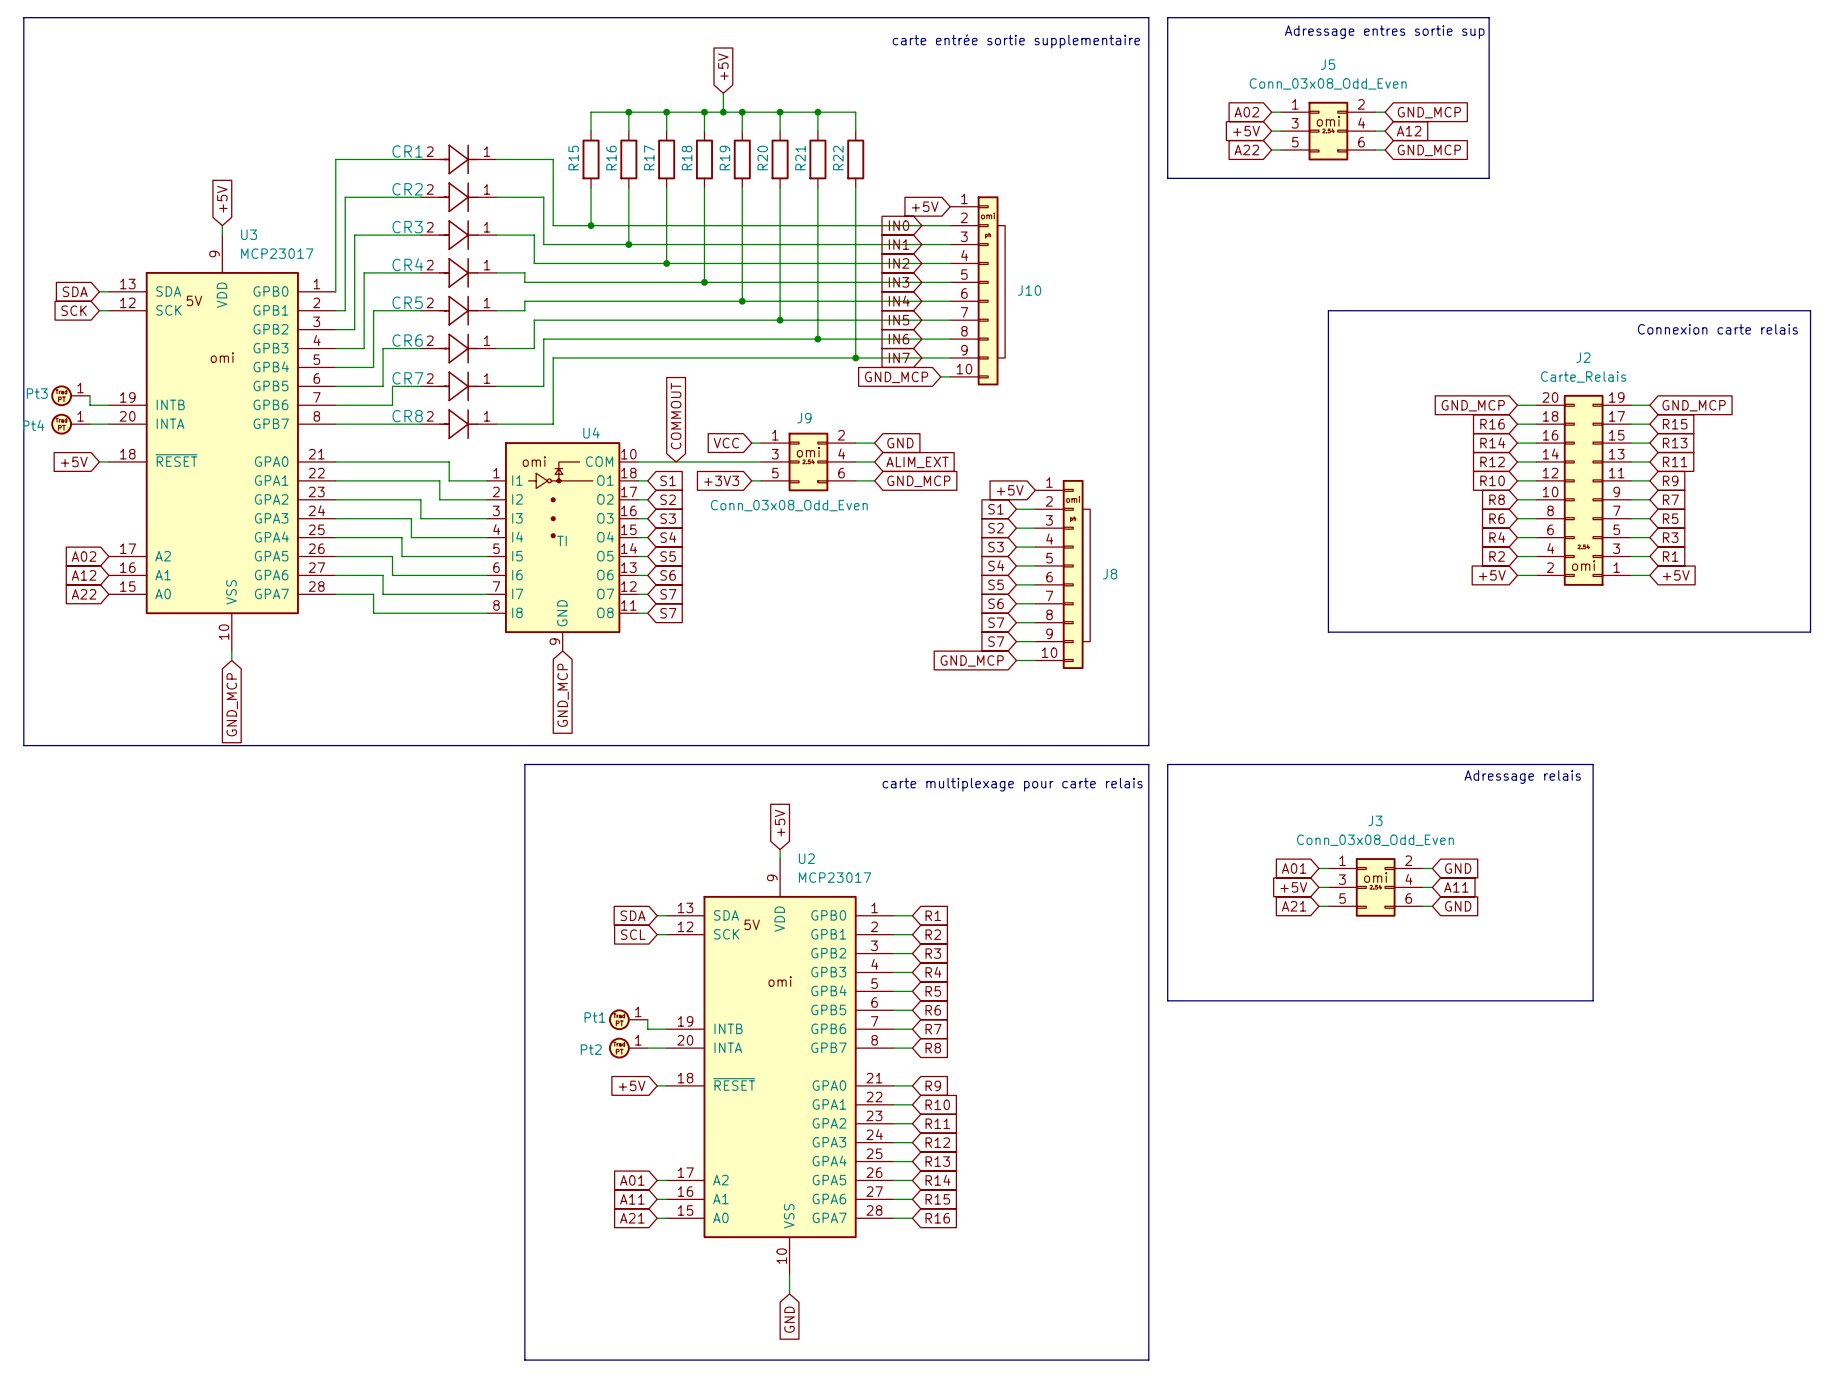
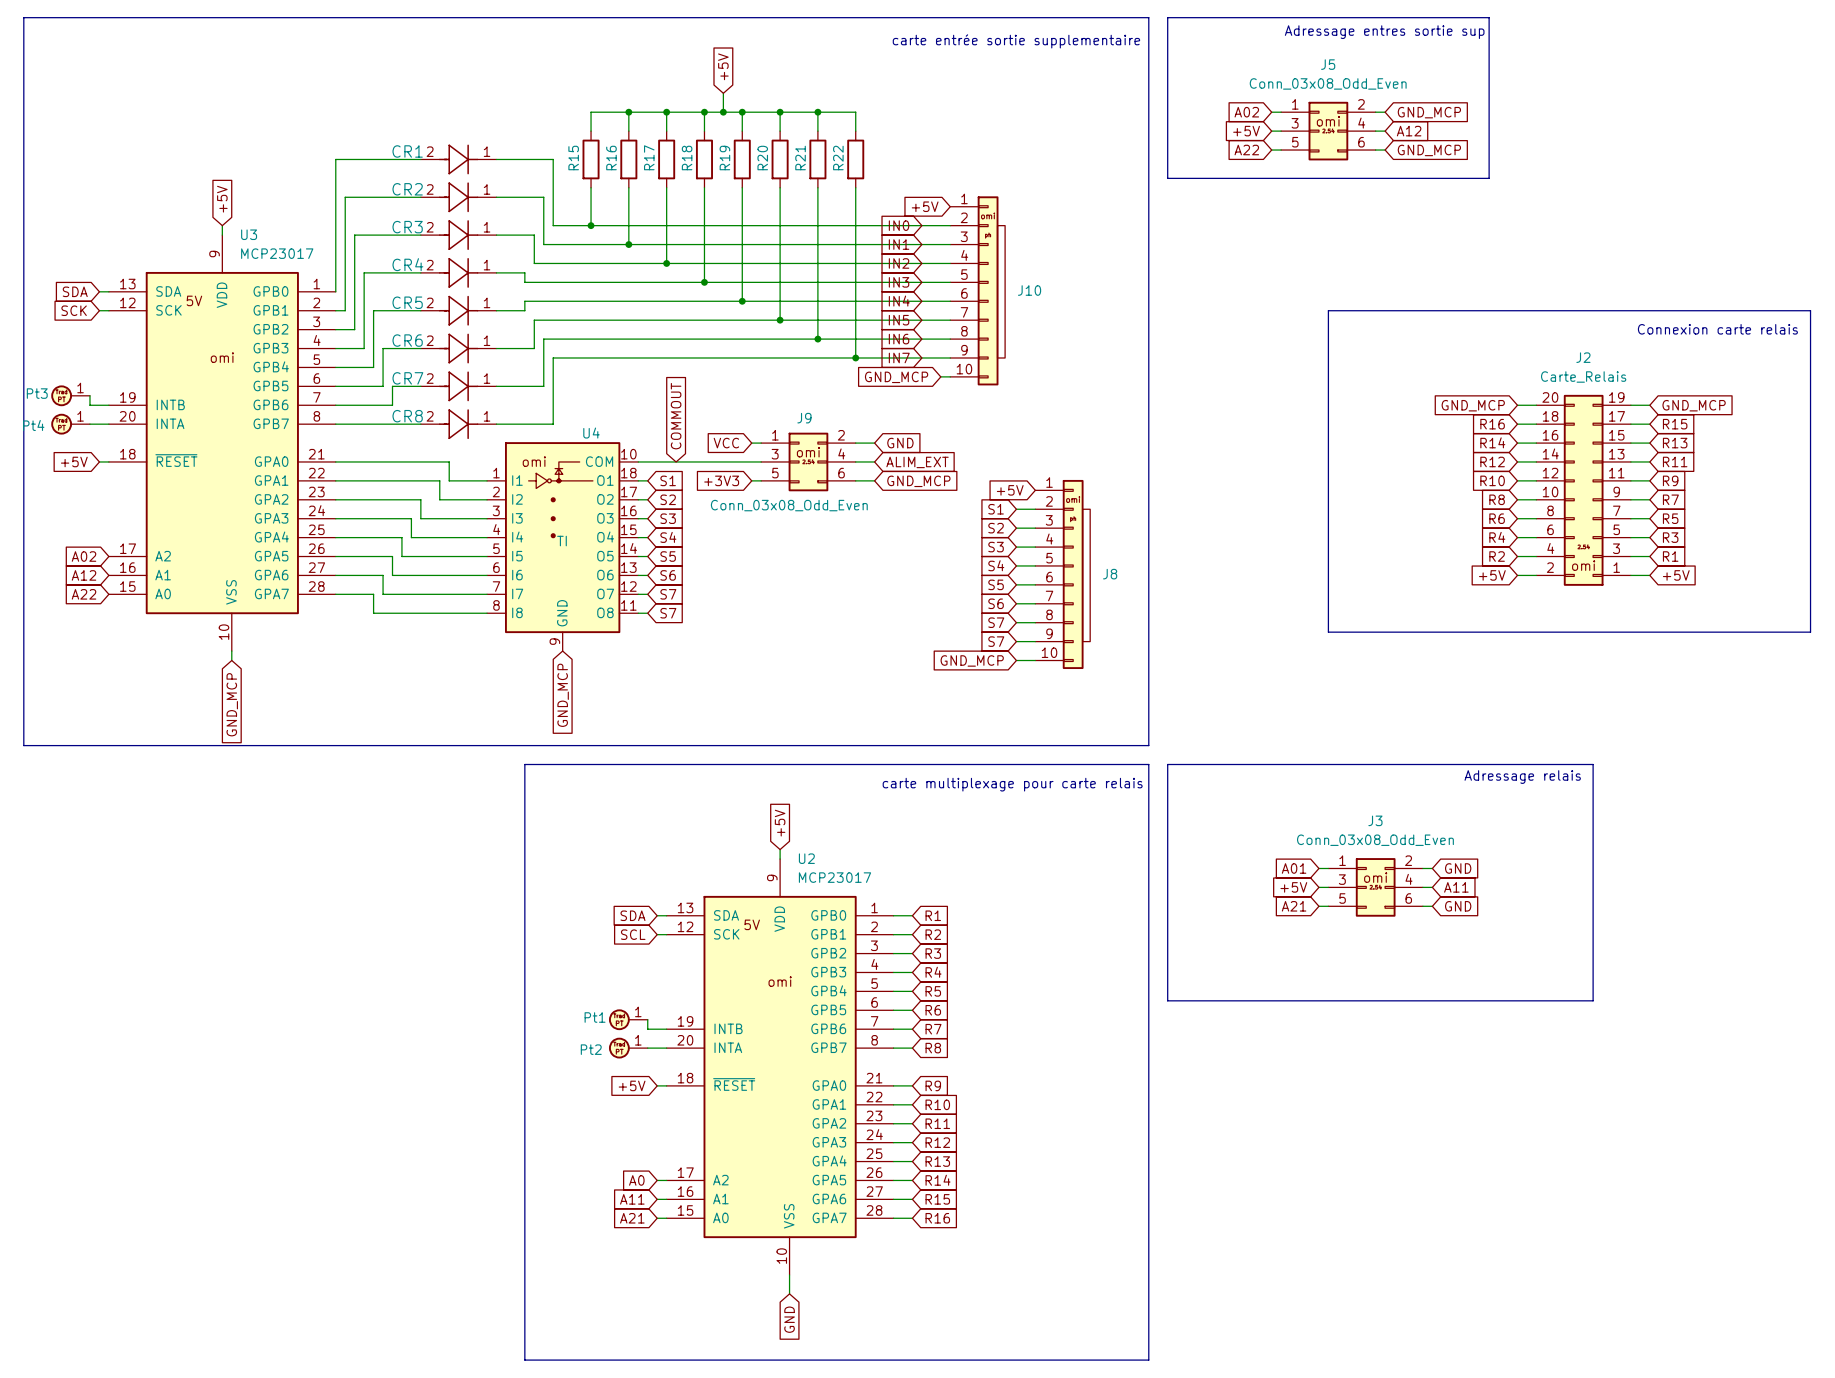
global label: A01 (632, 1180) -> A0 (636, 1180)

